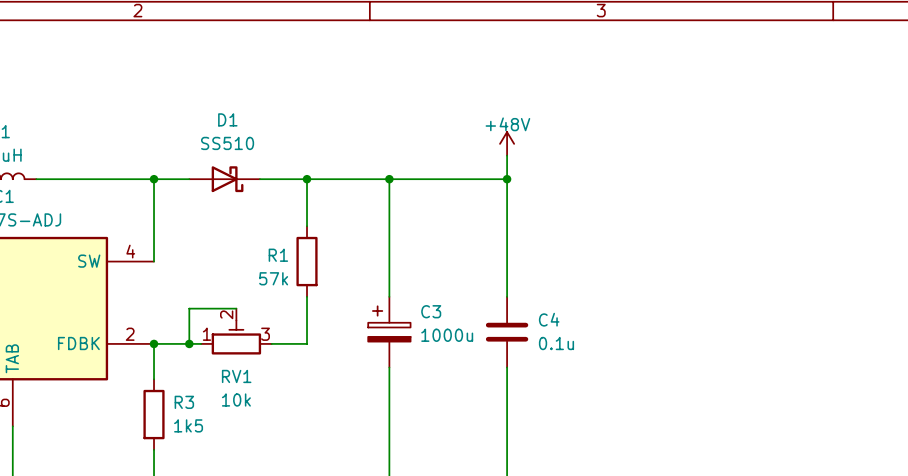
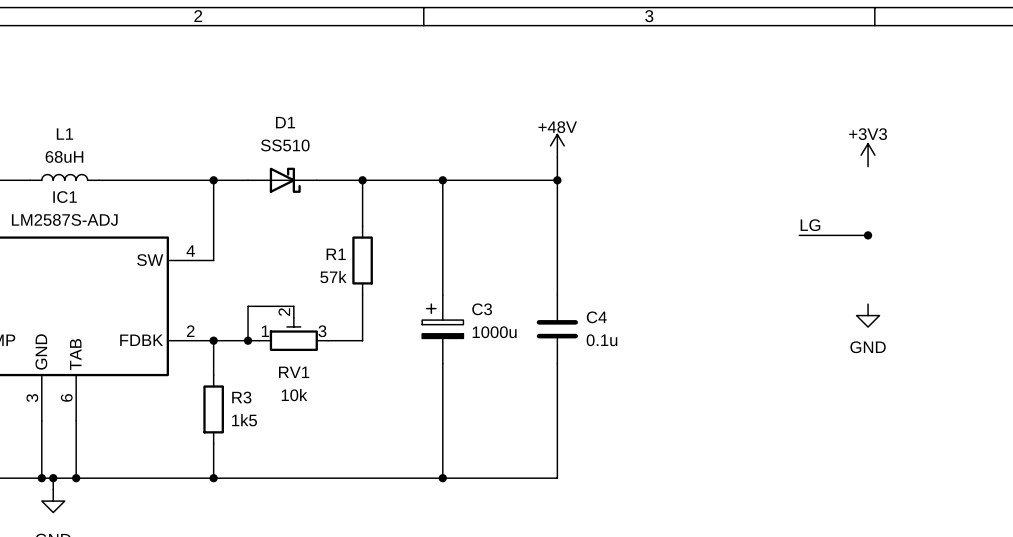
power symbol: none -> +3V3 (868, 155)
label: none -> LG (810, 225)
wire: none -> (799, 235) (868, 235)
junction: none -> (868, 235)
power symbol: none -> GND (868, 315)

